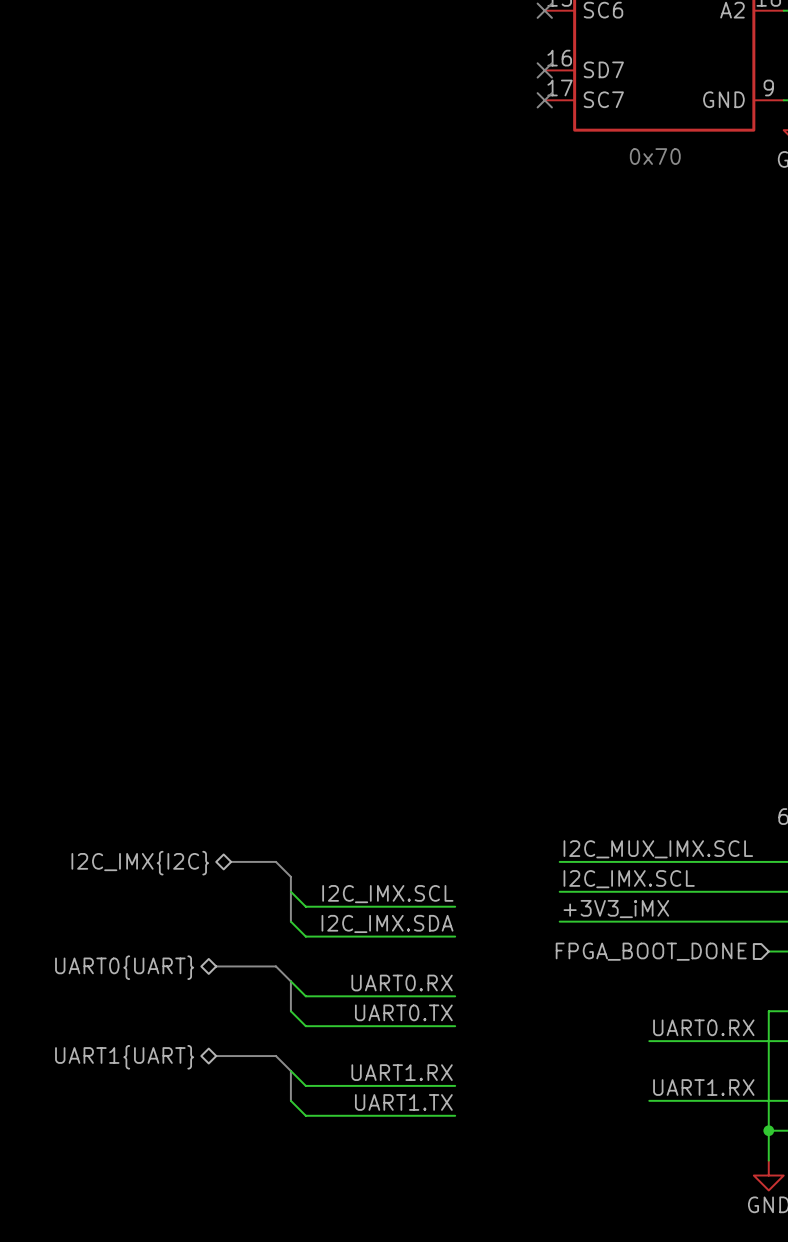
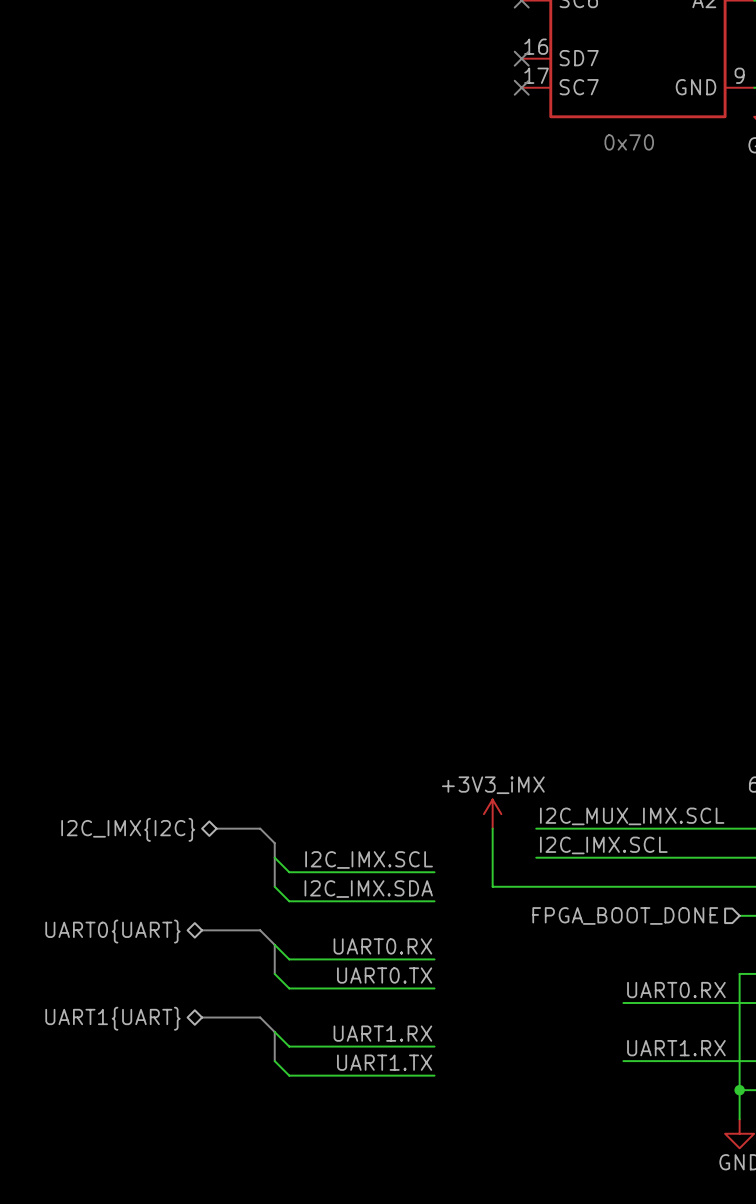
power symbol: none -> +3V3_iMX (492, 814)
wire: none -> (492, 828) (492, 886) (536, 886)
label: +3V3_iMX (616, 909) -> none

